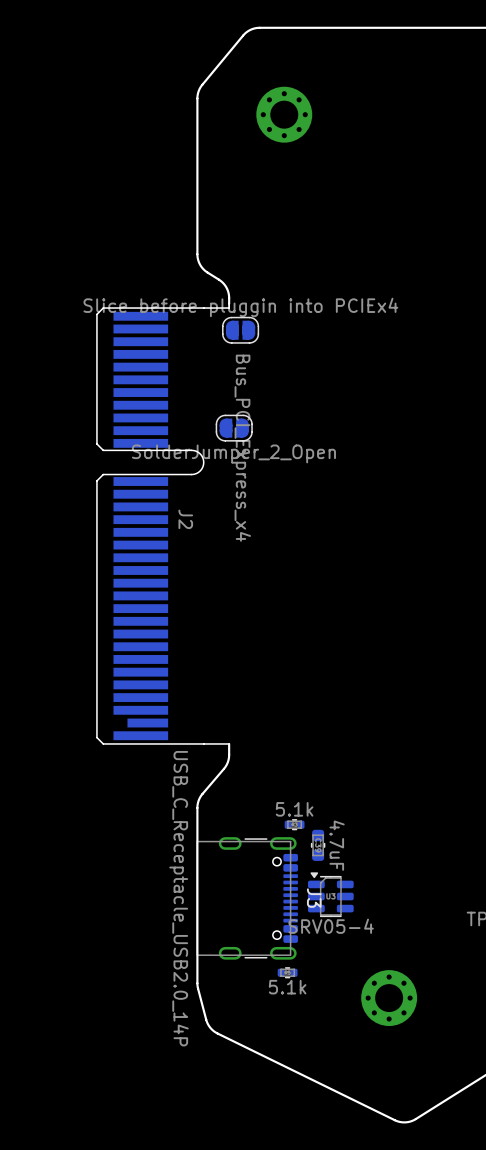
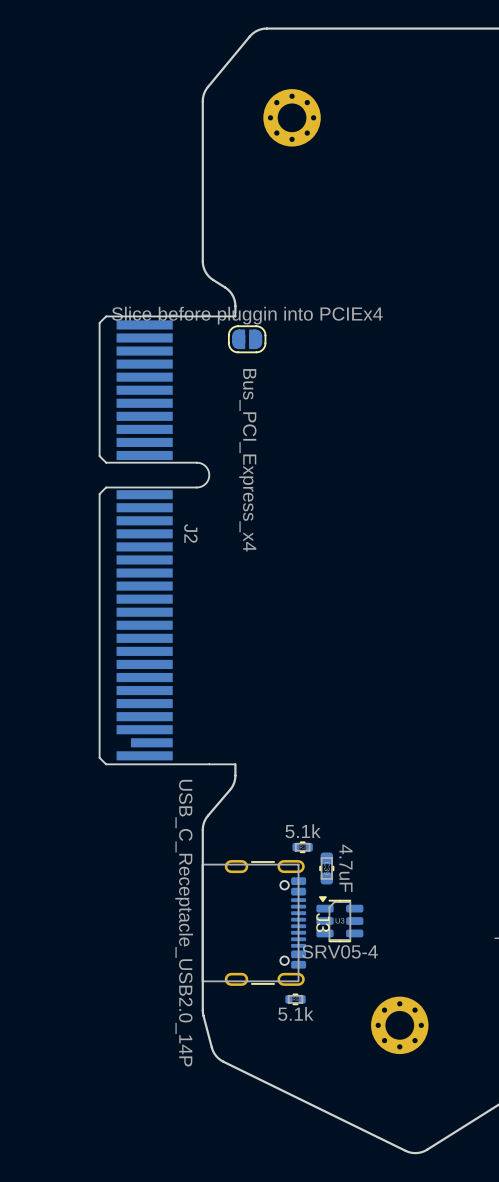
part: SolderJumper_2_Open (234, 428) -> none

